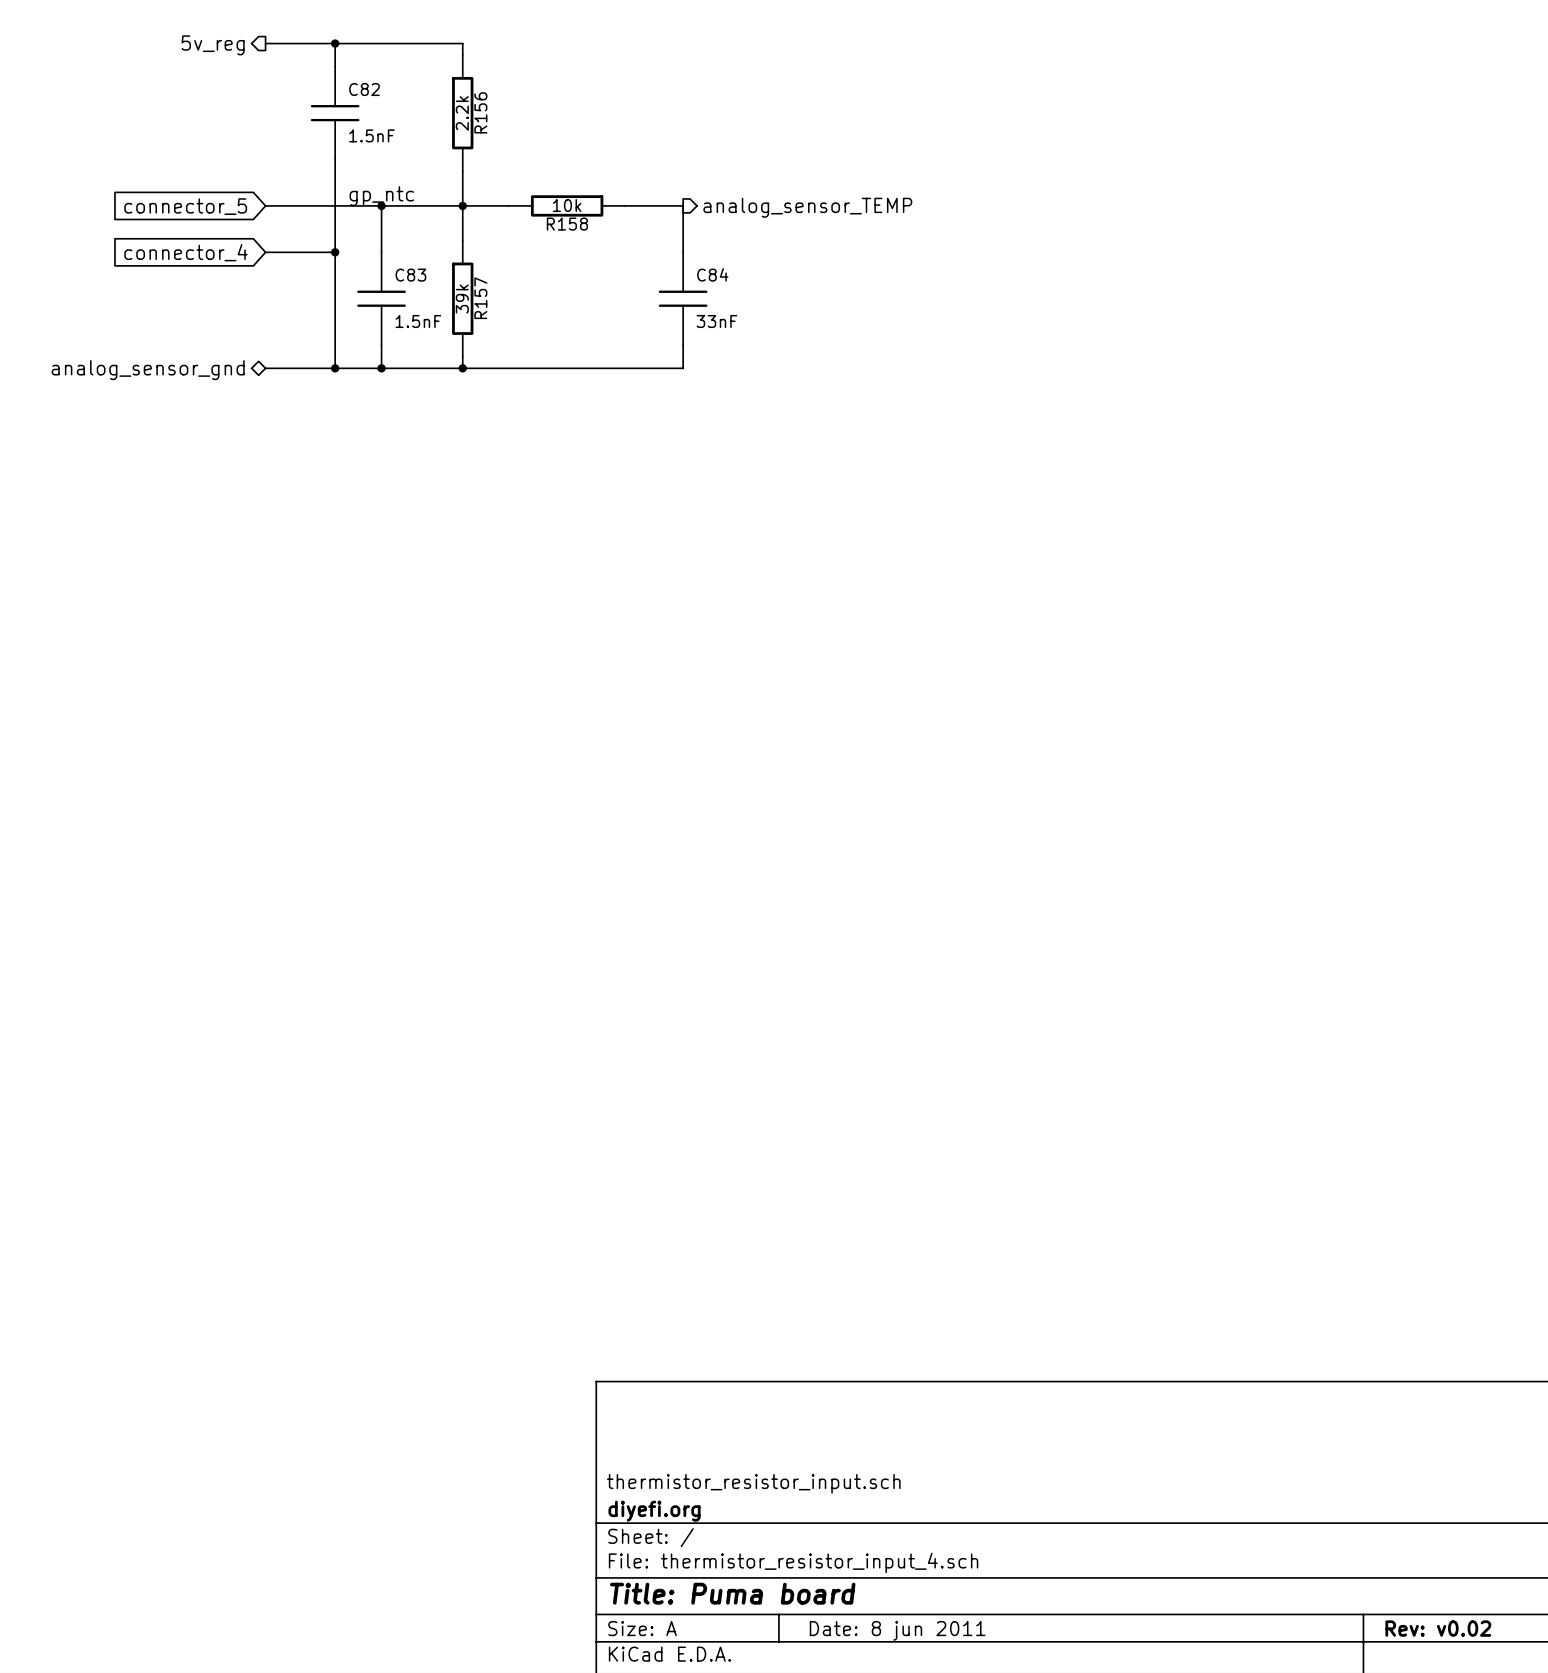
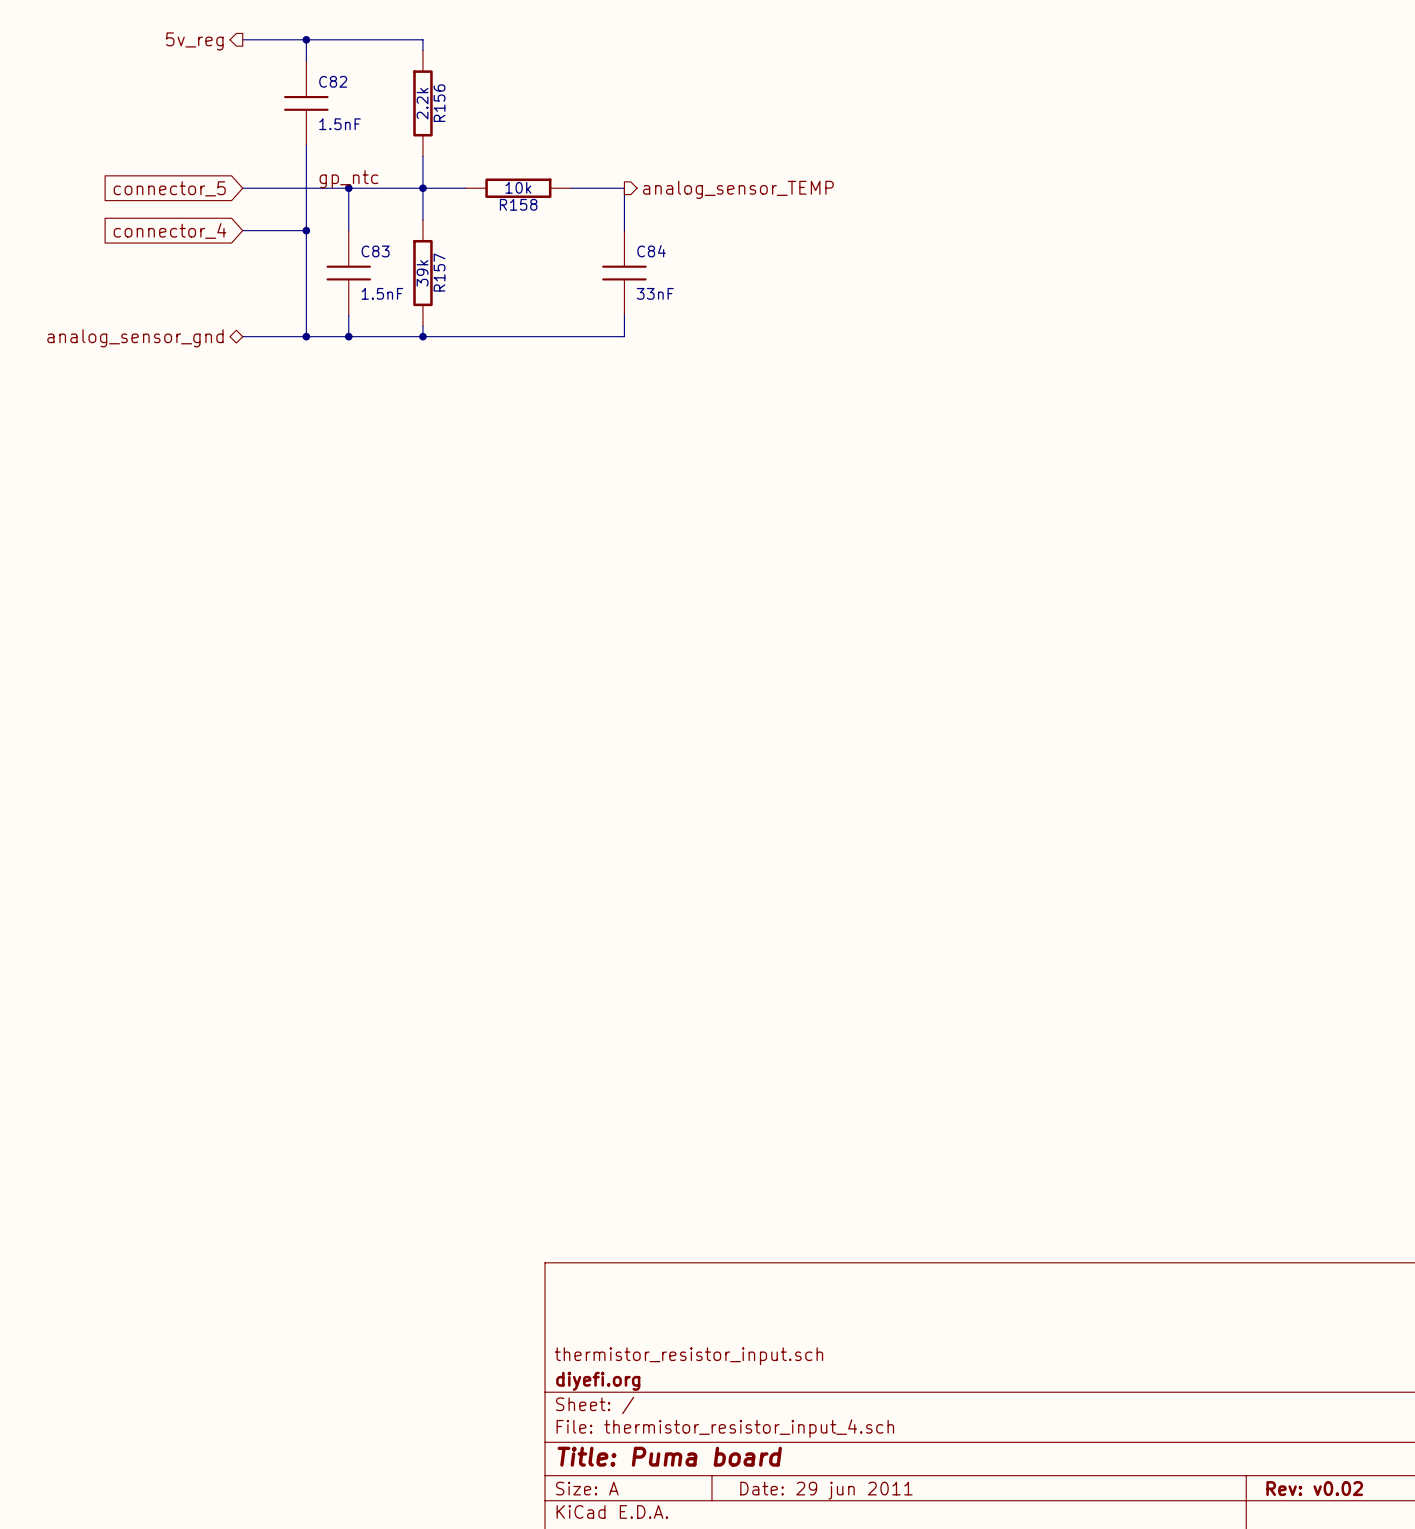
title block: Date: 8 jun 2011 (897, 1630) -> Date: 29 jun 2011 (826, 1490)

